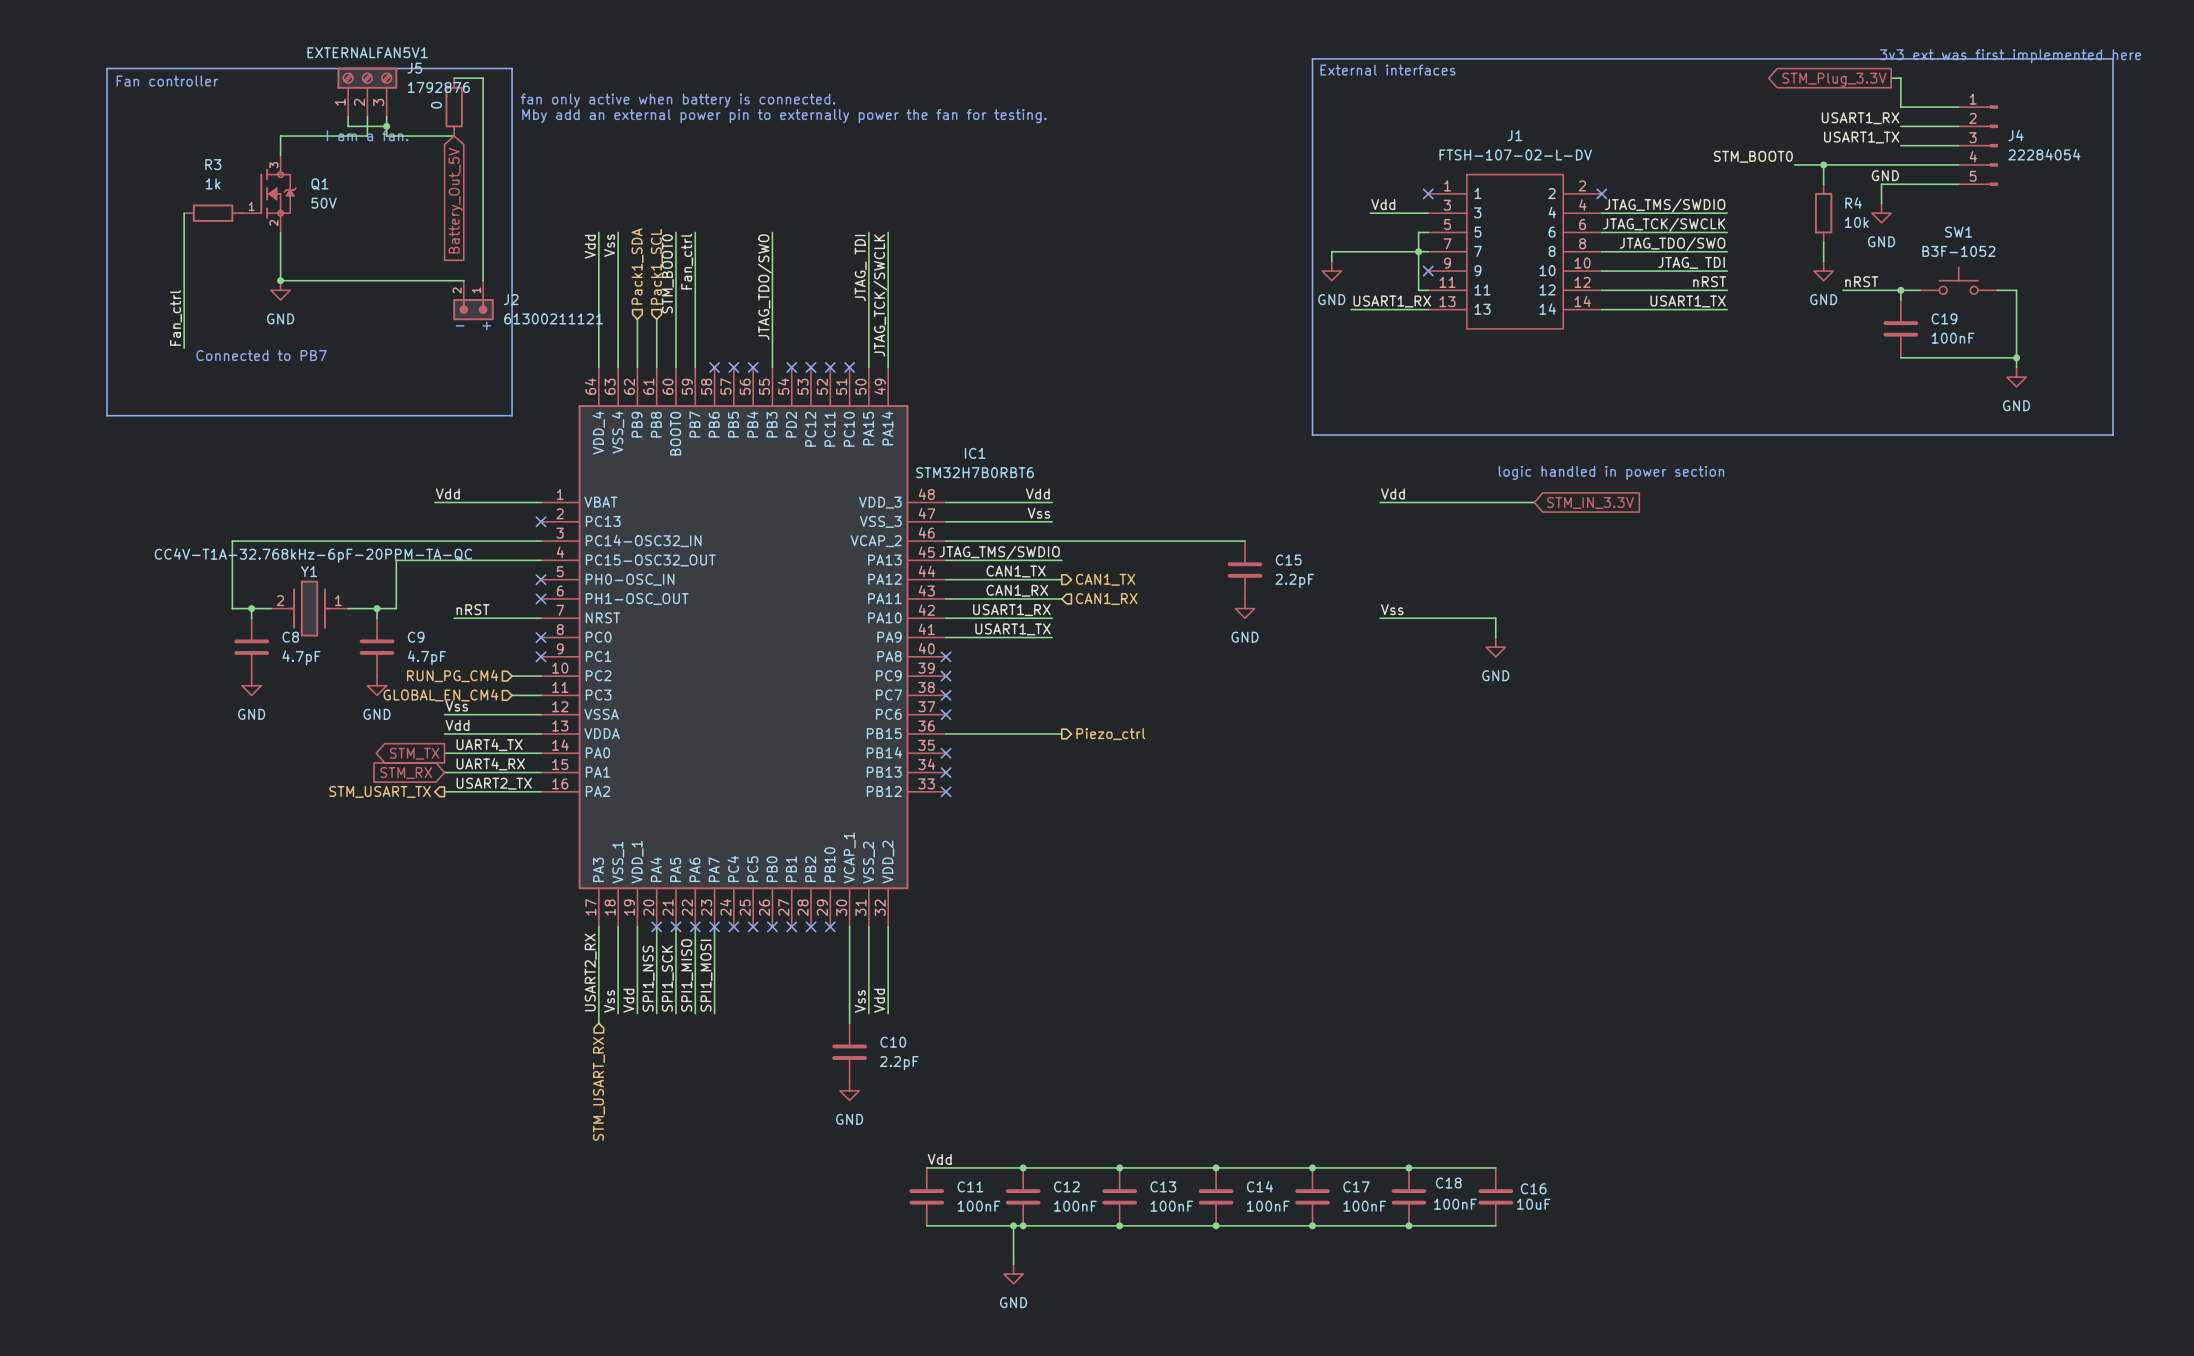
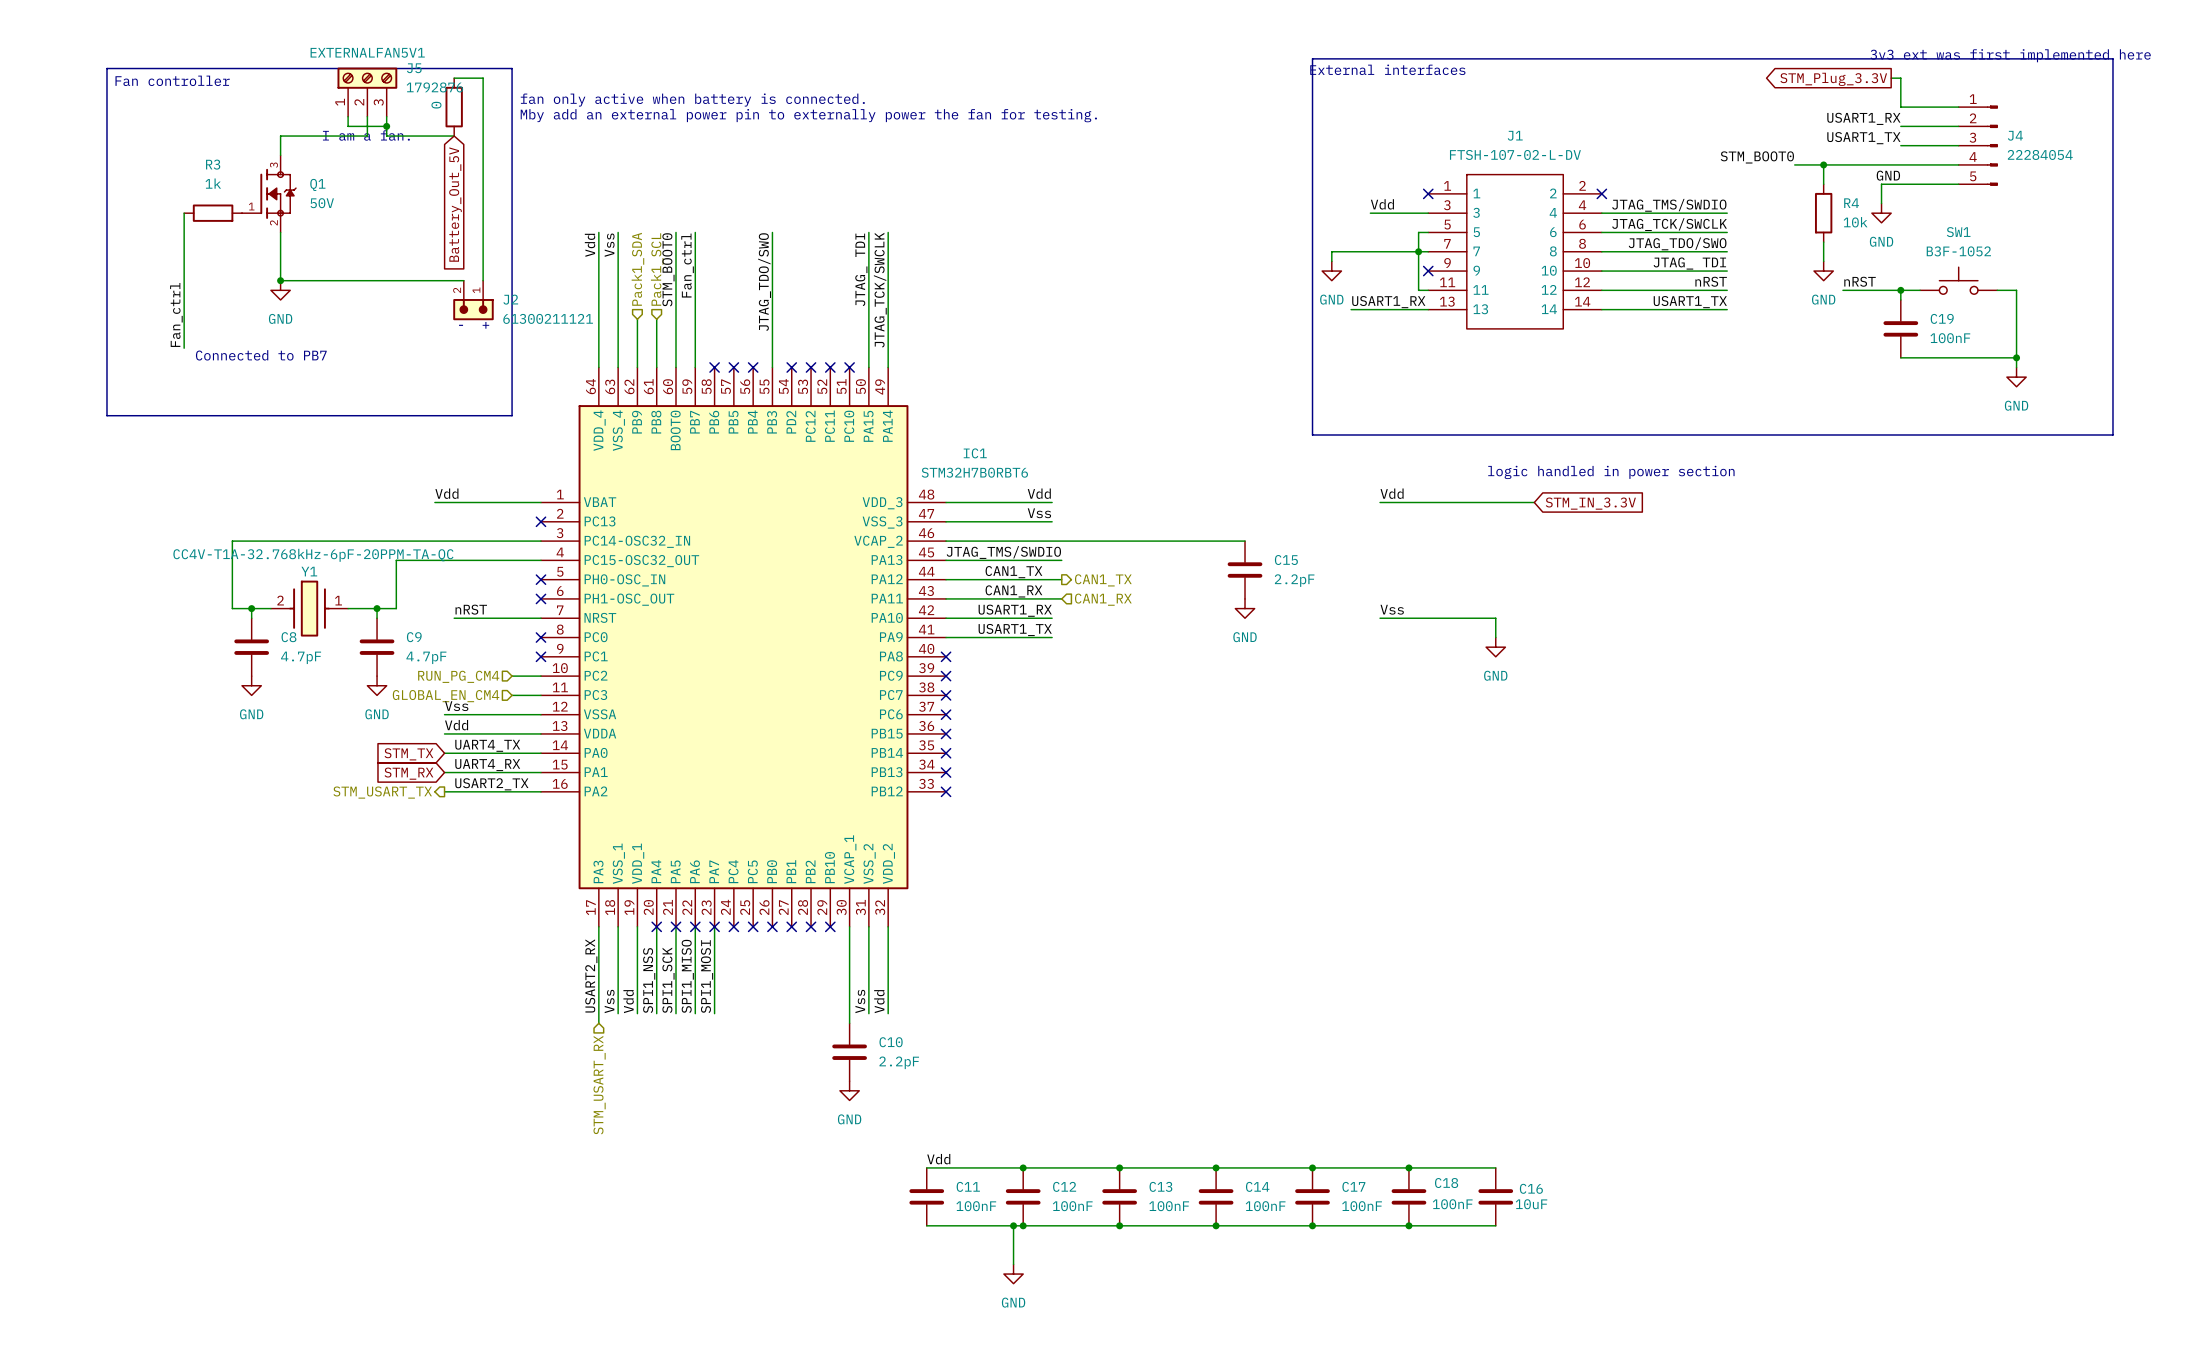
wire: (946, 733) (1061, 733) -> none
no-connect mark: none -> (946, 733)
hierarchical label: Piezo_ctrl (1110, 734) -> none
global label shape: output (414, 753) -> input (408, 754)

